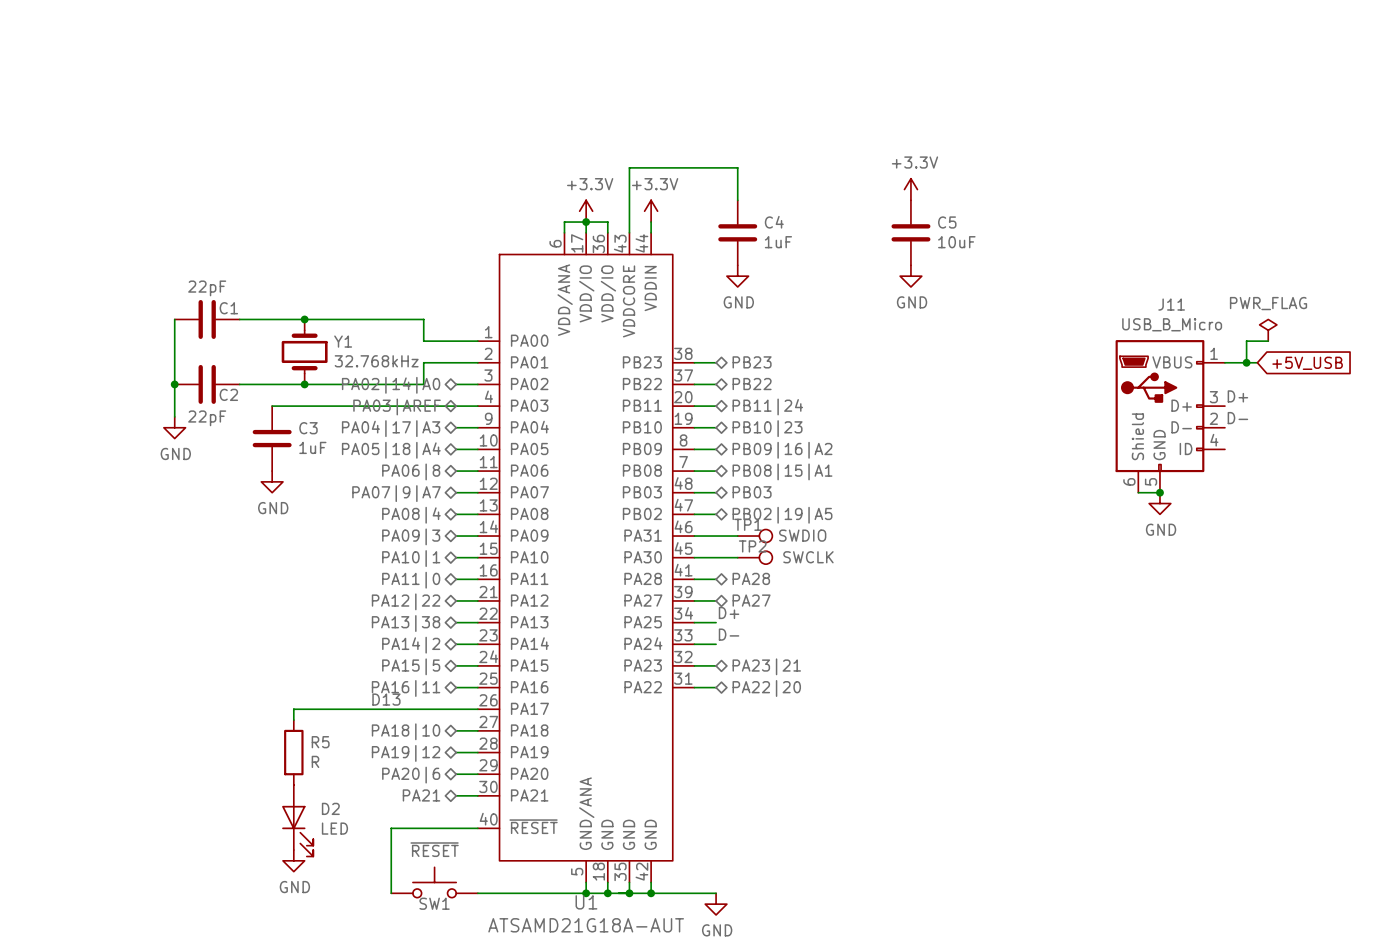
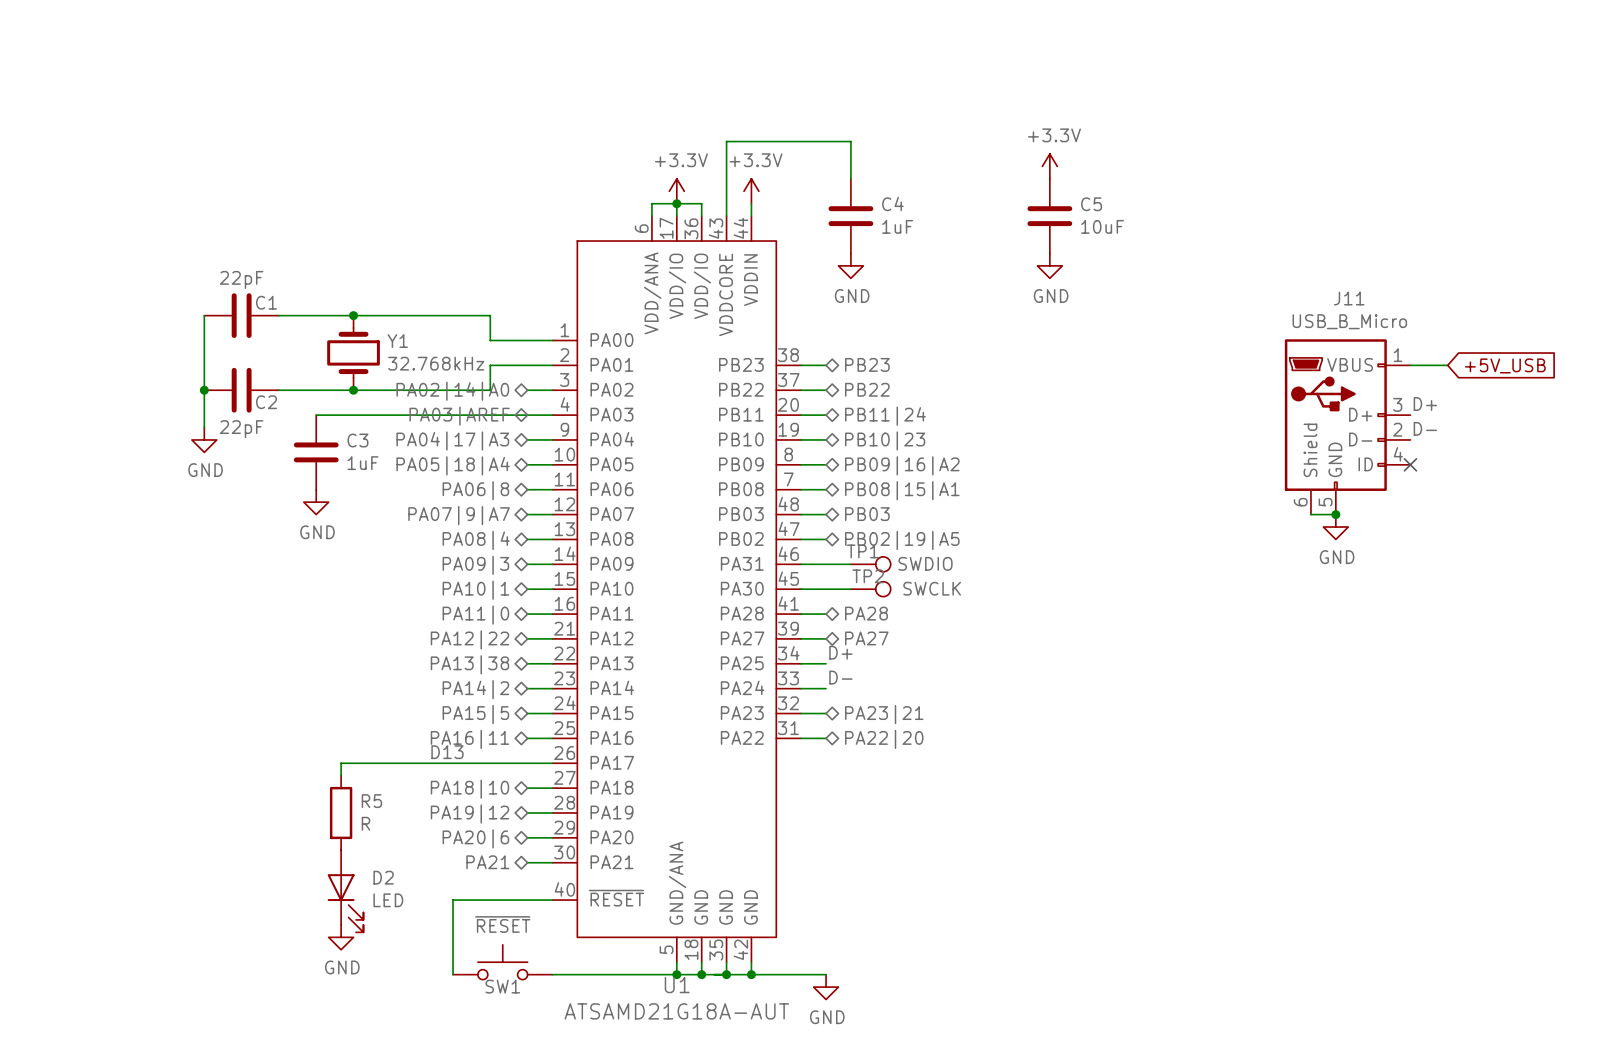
power symbol: PWR_FLAG (1268, 330) -> none
wire: (1268, 341) (1246, 341) (1246, 362) -> none
junction: (1246, 362) -> none
no-connect mark: none -> (1410, 464)

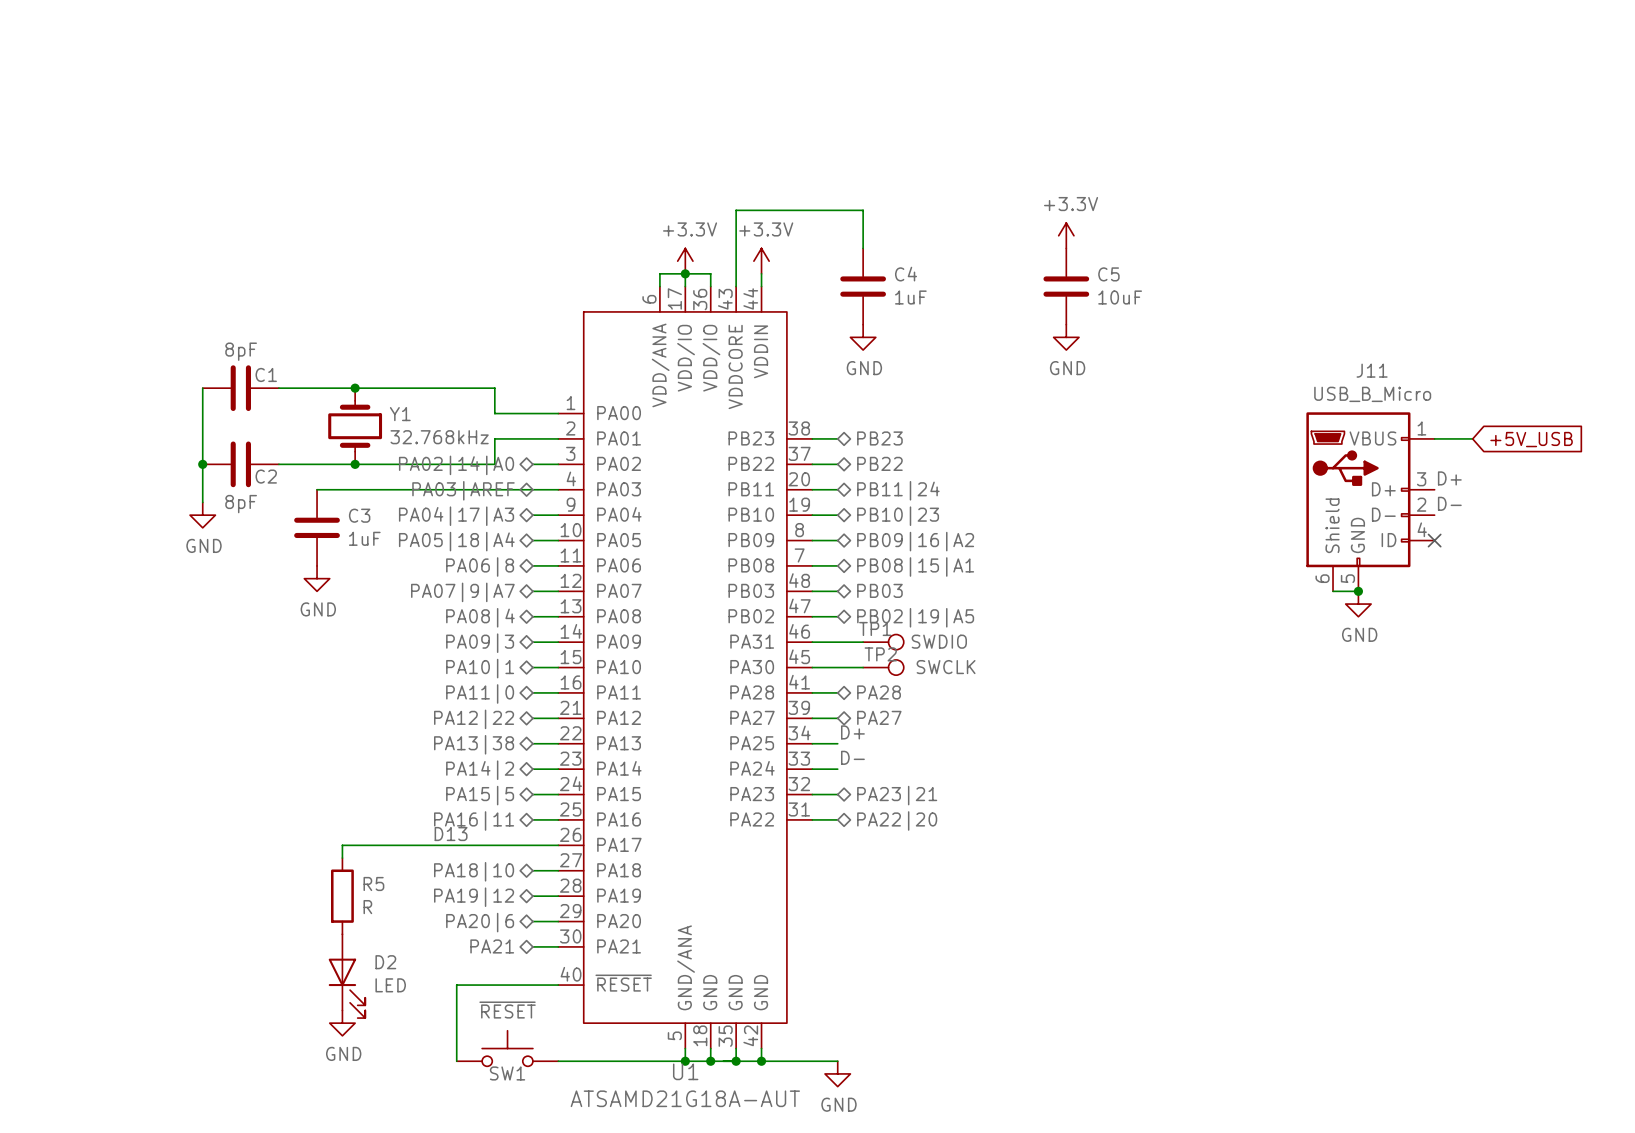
C1 value: 22pF (241, 279) -> 8pF (241, 351)
C2 value: 22pF (241, 429) -> 8pF (241, 504)

